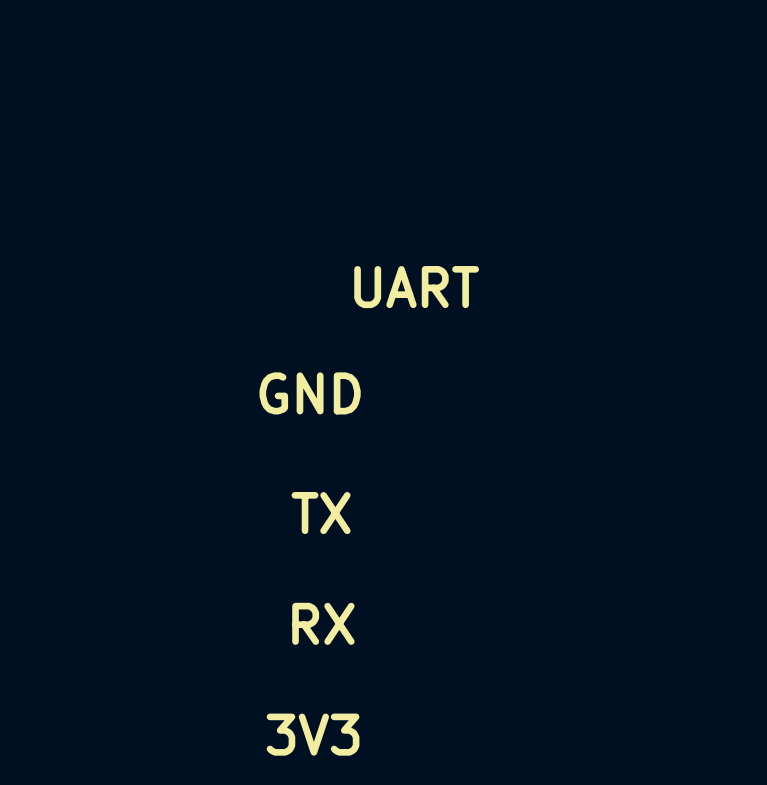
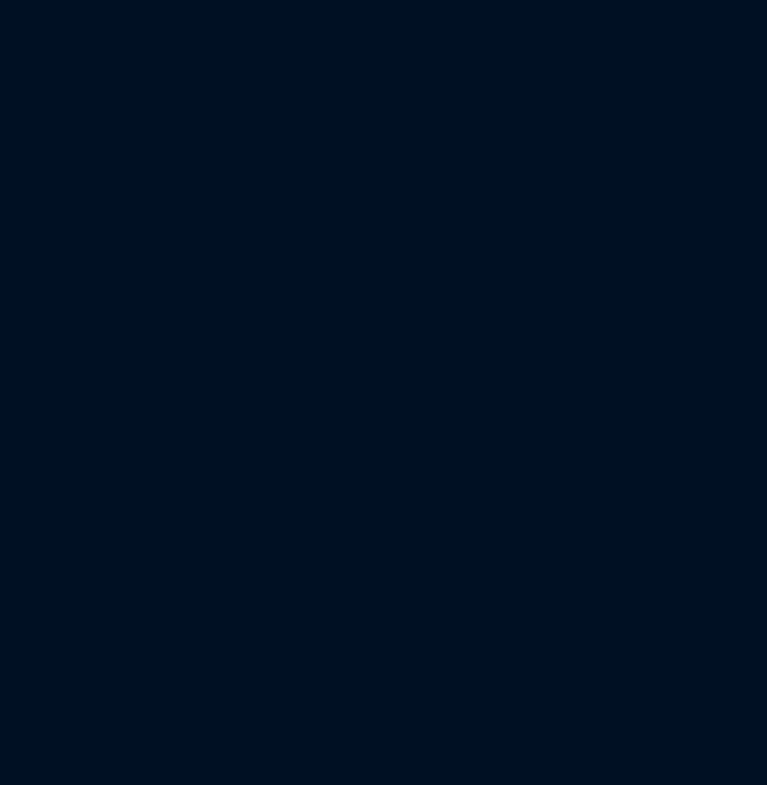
text: UART (416, 287) -> none
text: GND (310, 393) -> none
text: TX (321, 513) -> none
text: RX (323, 623) -> none
text: 3V3 (313, 734) -> none

